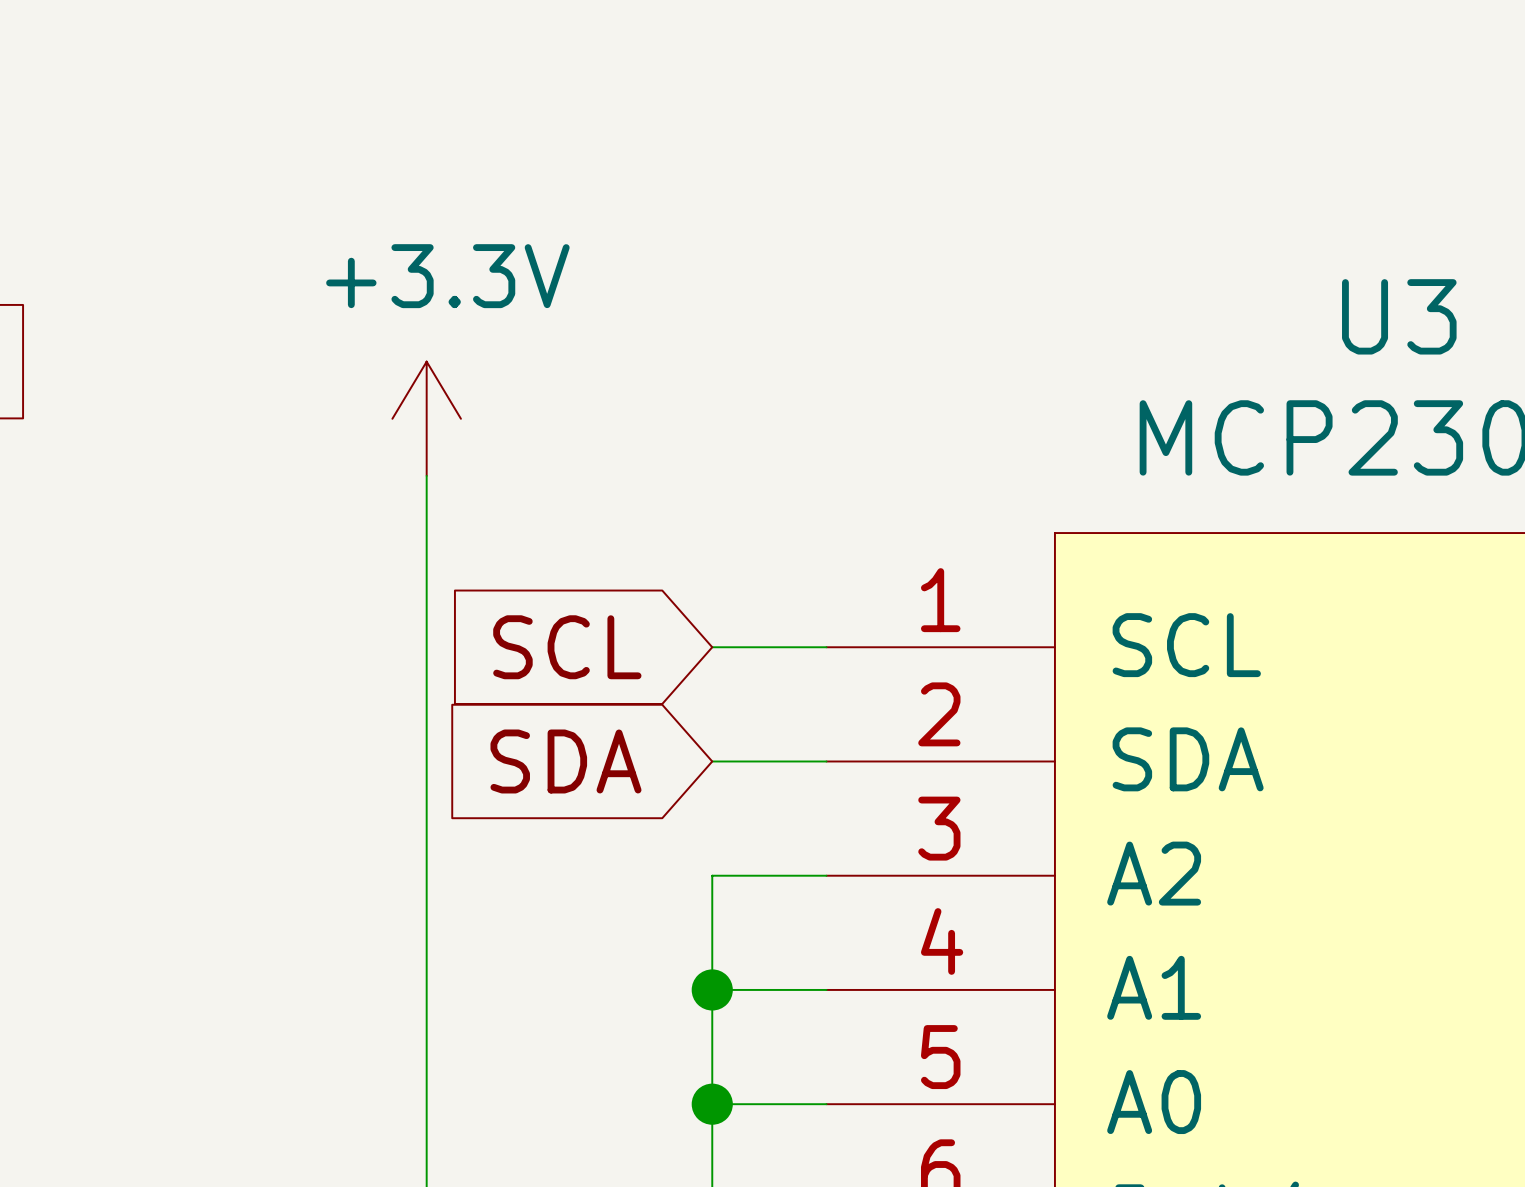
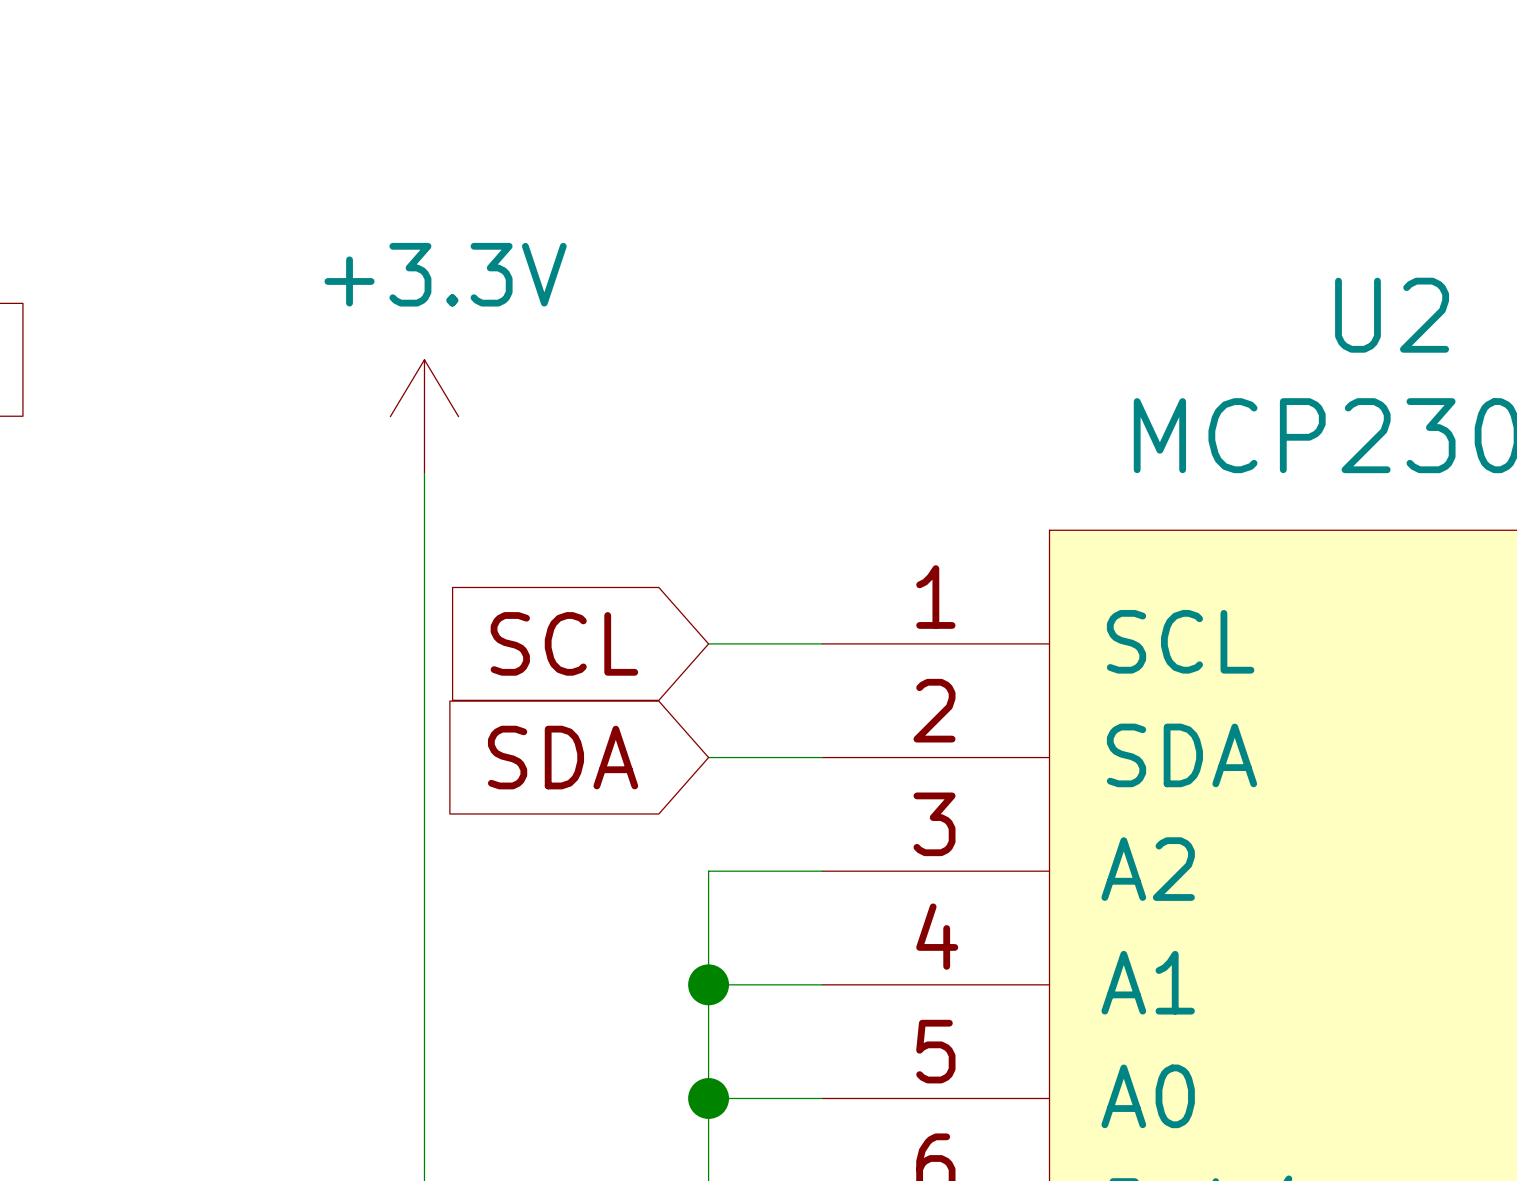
U3 name: U3 (1399, 316) -> U2 (1392, 315)

